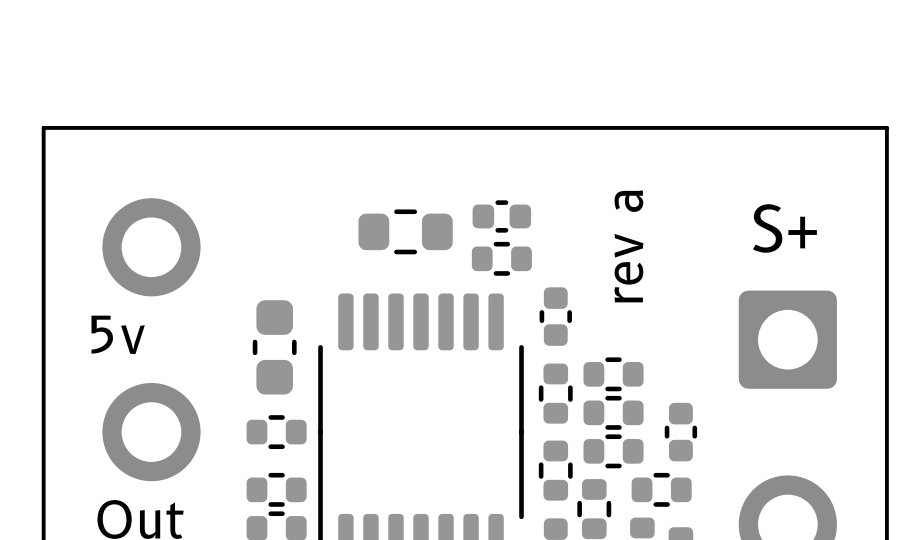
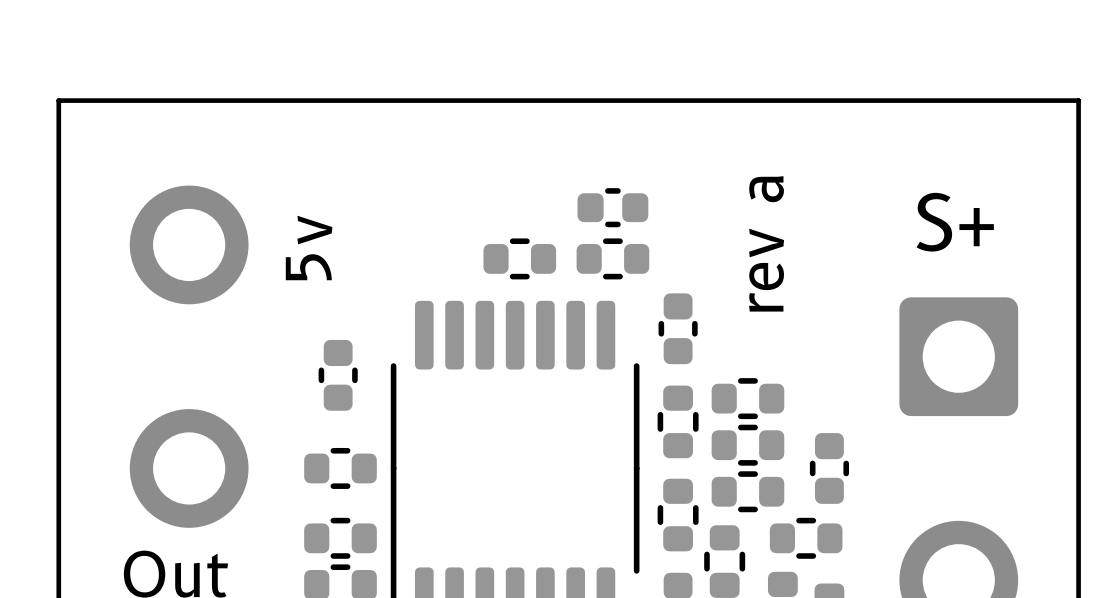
part footprint: [358, 209, 453, 255] -> [483, 238, 557, 280]
part footprint: [252, 300, 297, 395] -> [318, 339, 358, 411]
text rotation: 0° (118, 334) -> 90° counterclockwise (309, 247)
text position: 5v (118, 334) -> 5v (309, 247)

